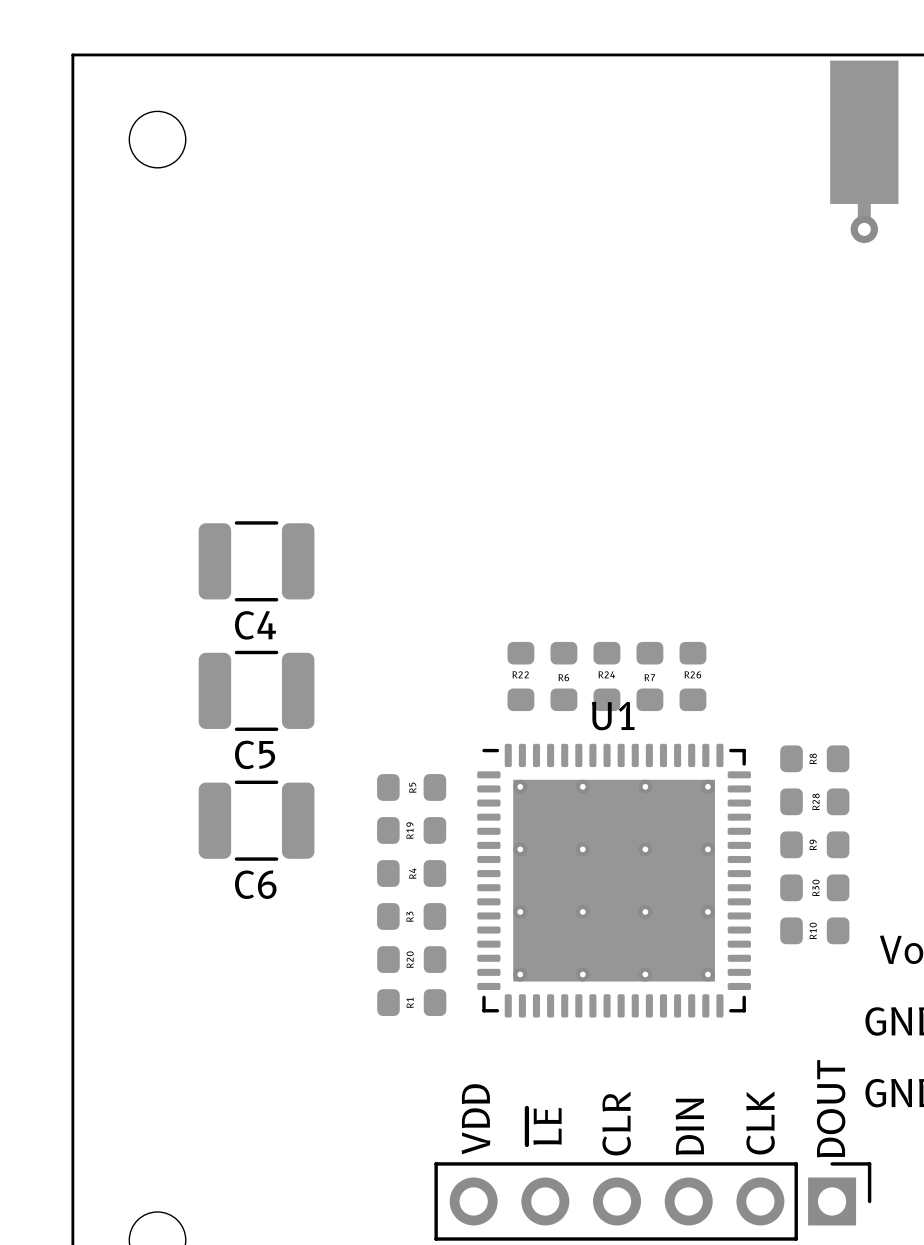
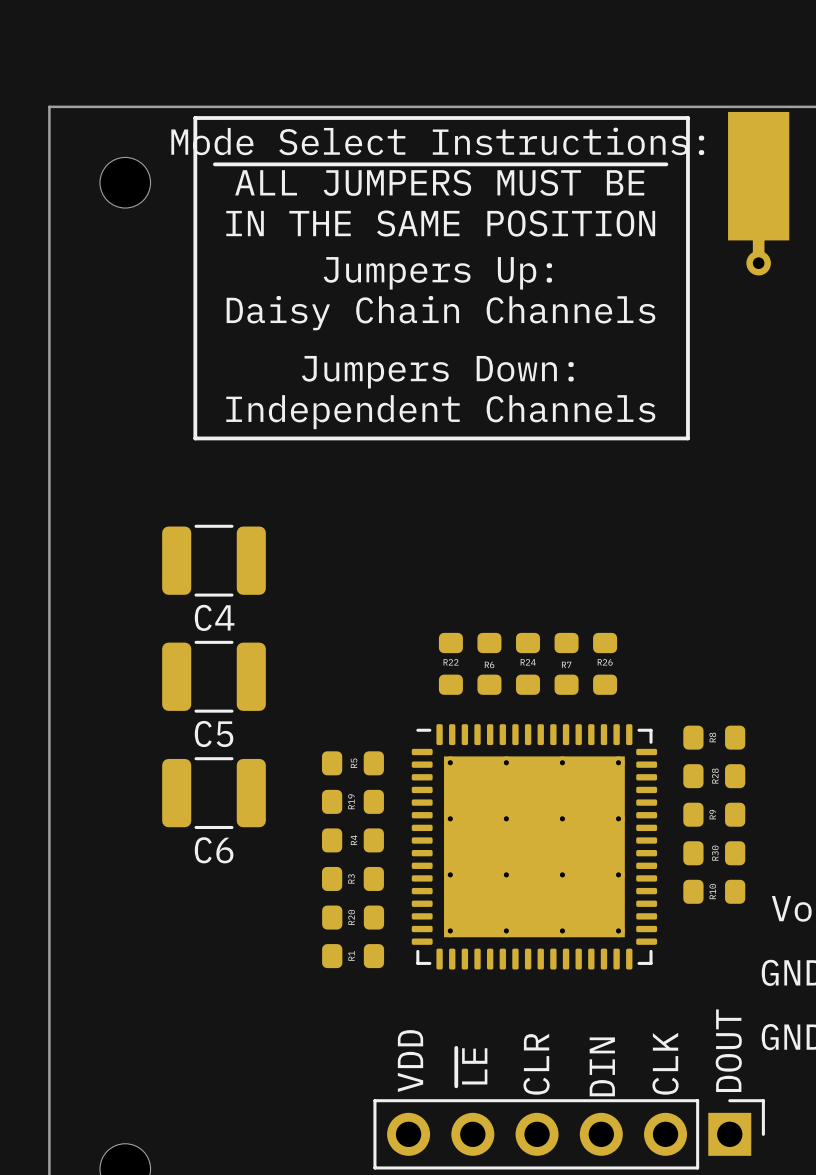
line: none -> (195, 118) (687, 118) (687, 438) (195, 438) (195, 118)
text: none -> Mode Select Instructions: (437, 141)
text: none -> ~{ ALL JUMPERS MUST BE } (440, 180)
text: none -> IN THE SAME POSITION (440, 223)
text: none -> Jumpers Up: (437, 273)
text: none -> Daisy Chain Channels (440, 313)
text: none -> Jumpers Down: (437, 372)
text: none -> Independent Channels (440, 412)
U1 name: U1 (613, 716) -> none

